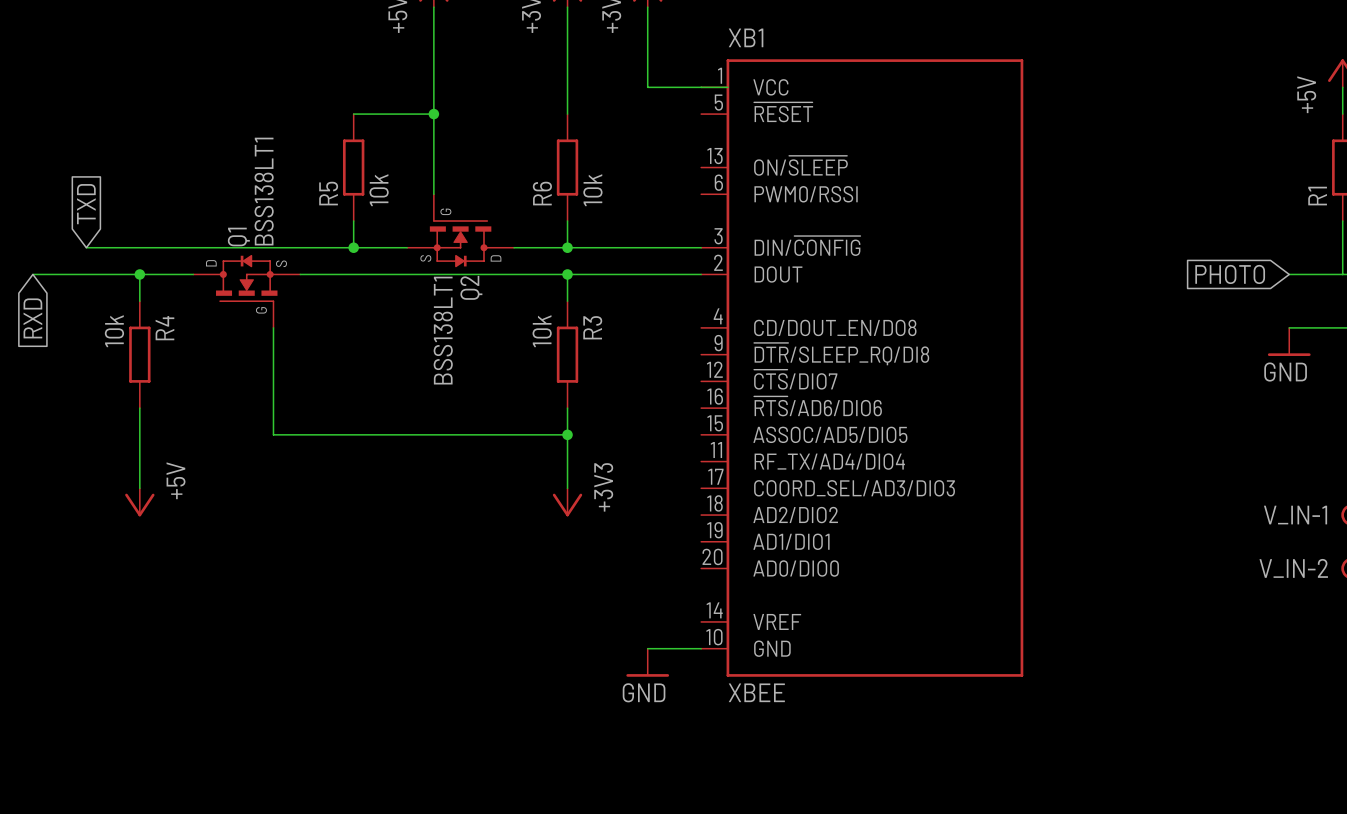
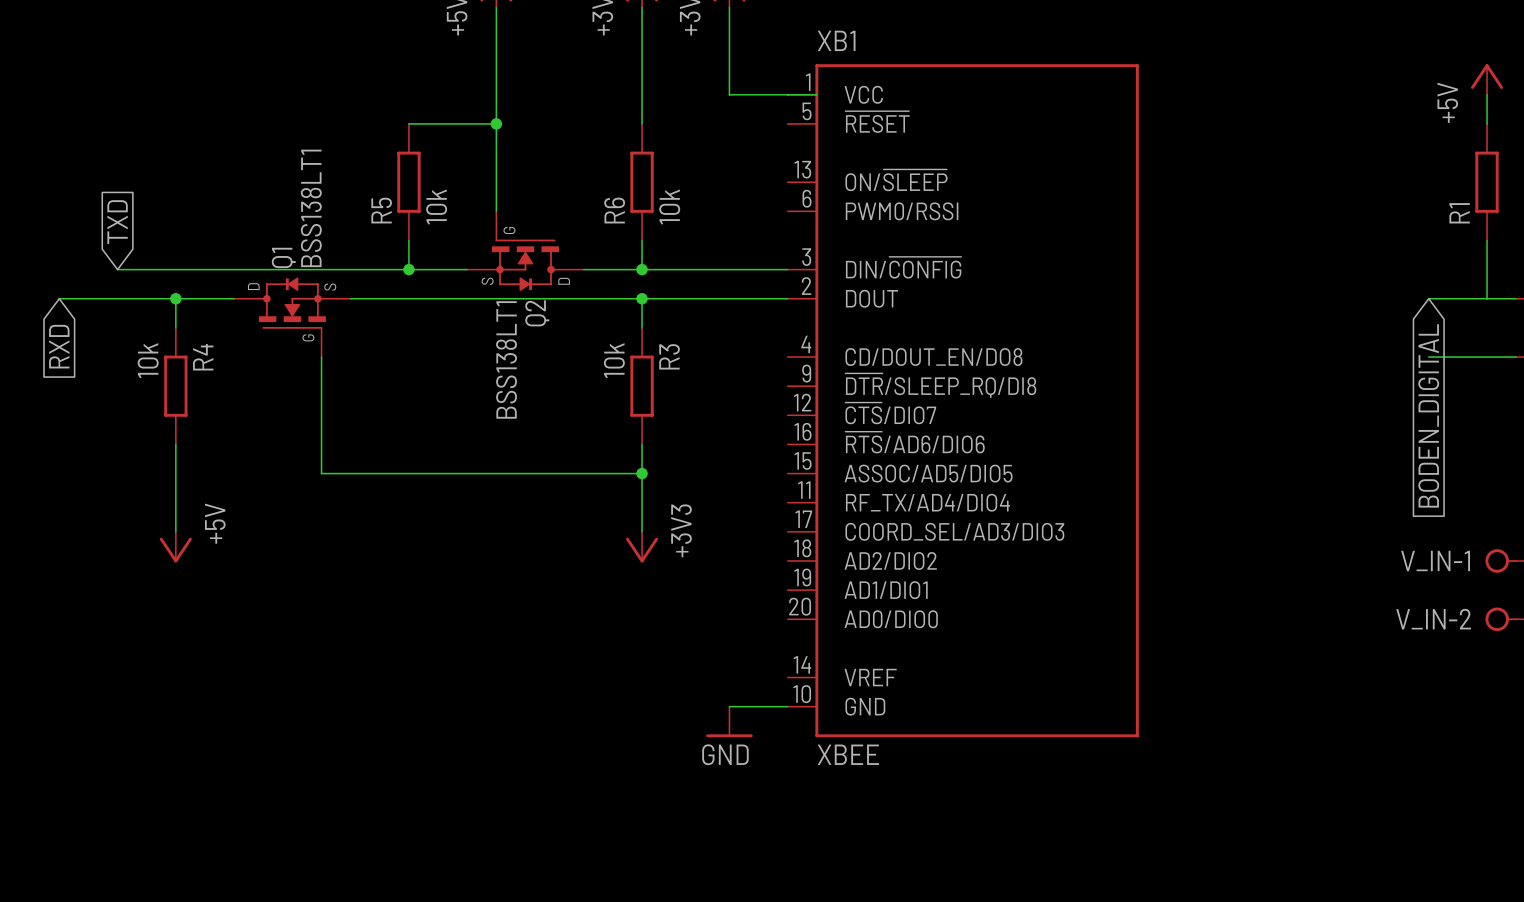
global label: PHOTO (1230, 274) -> BODEN_DIGITAL (1428, 415)
power symbol: GND (1289, 341) -> none

